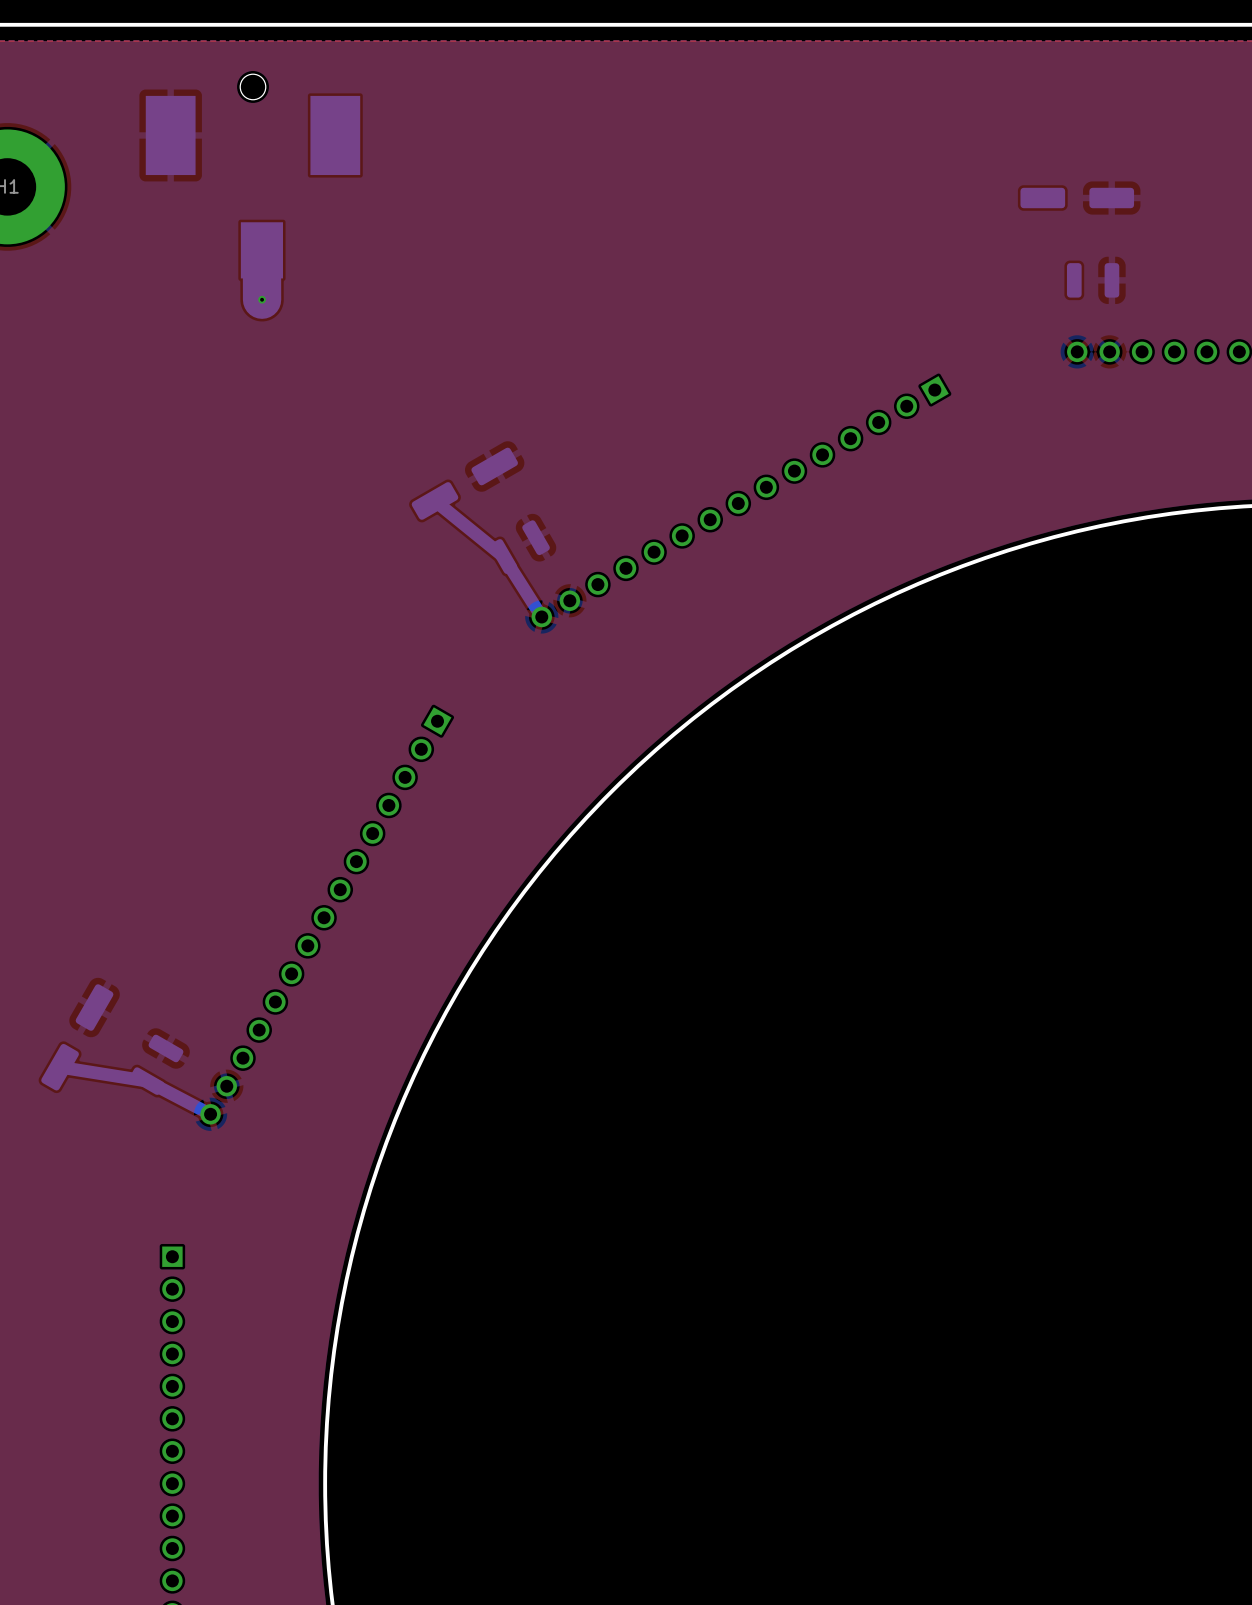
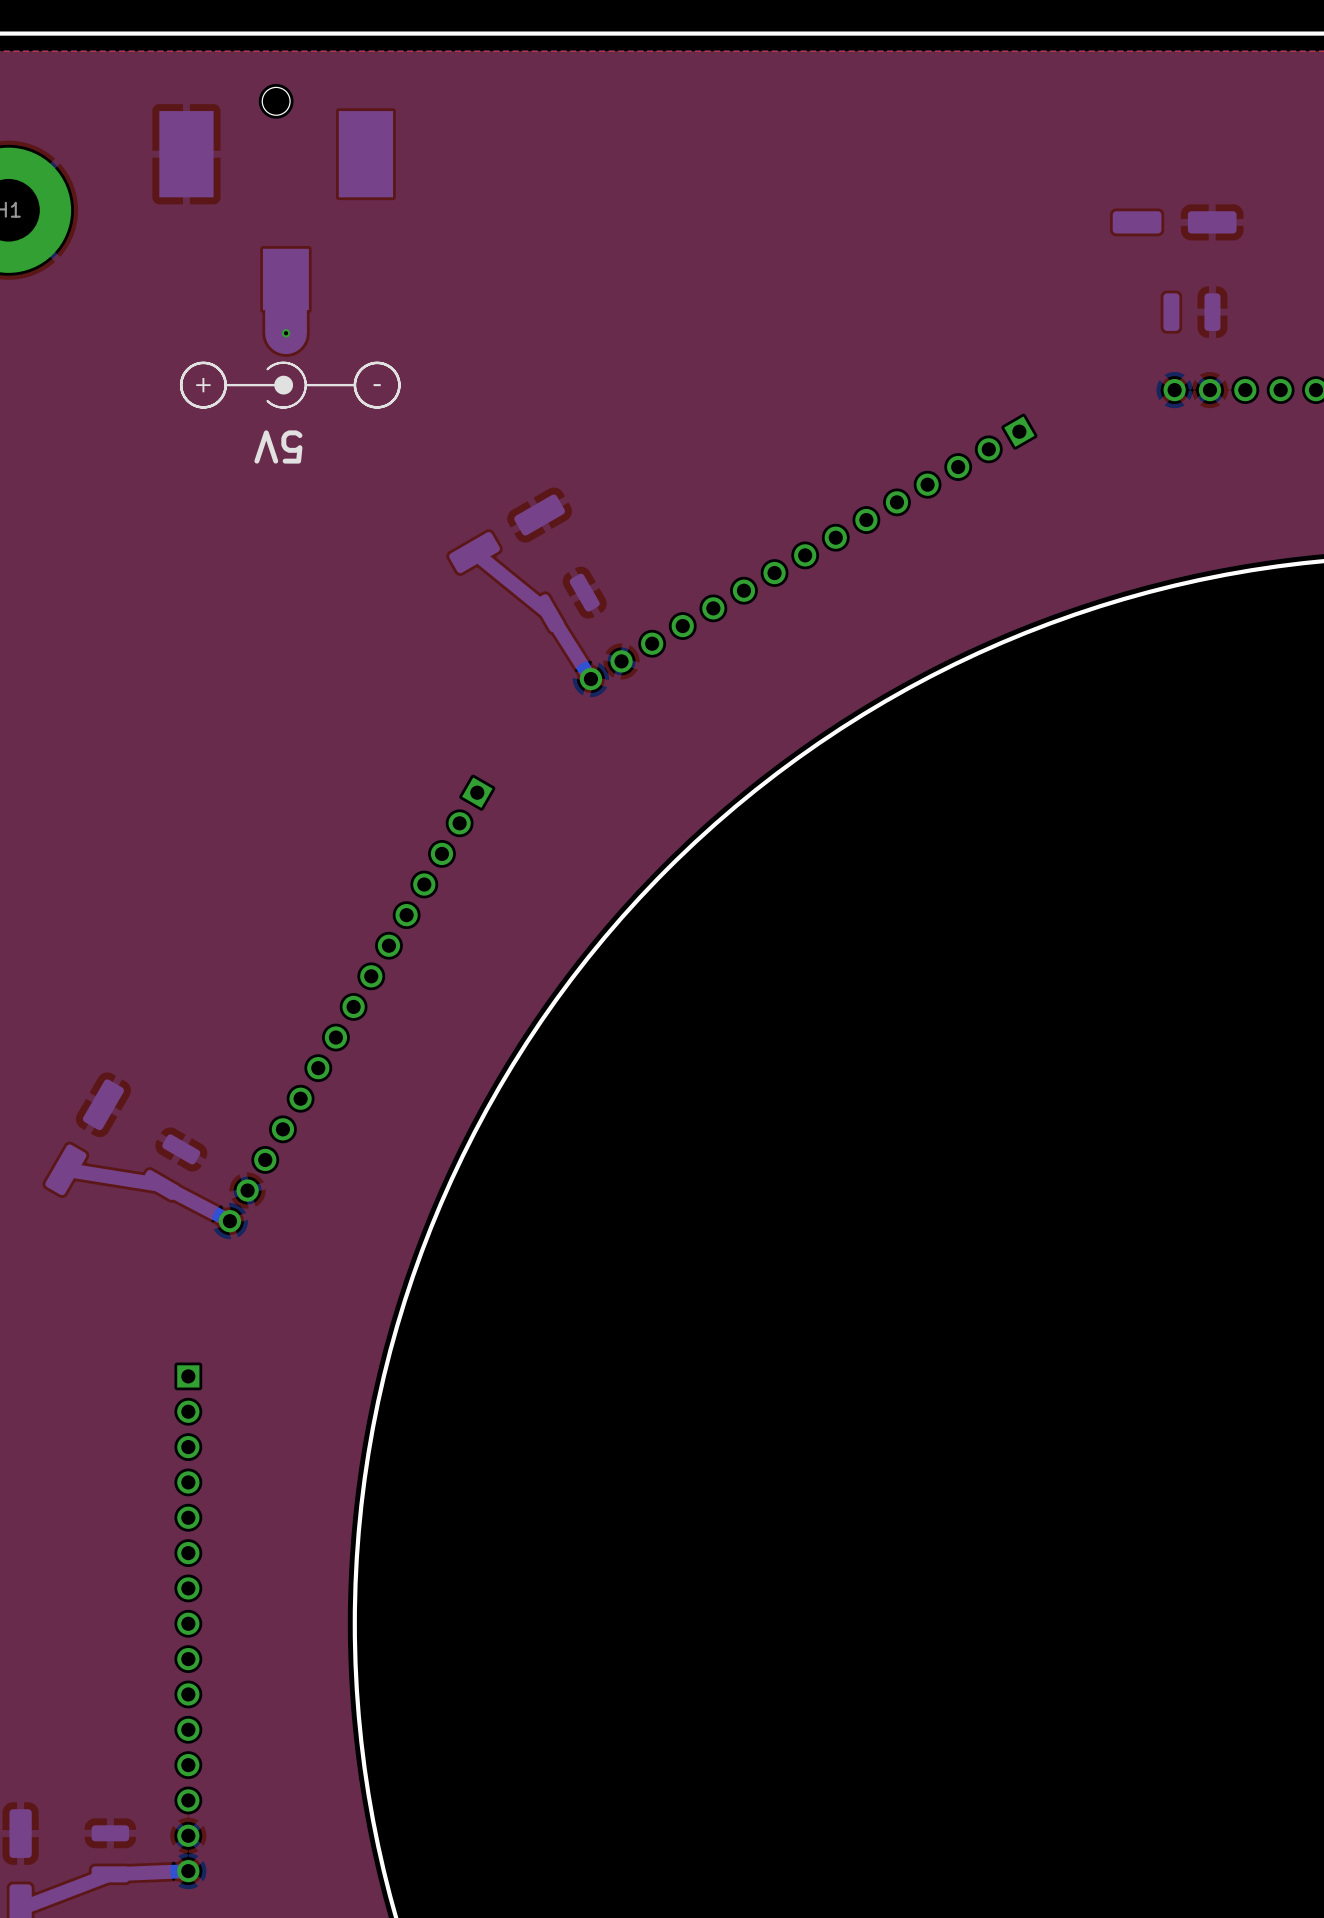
line: none -> (202, 362) (211, 364) (218, 368) (223, 375) (225, 383) (224, 392) (219, 400) (213, 405) (204, 407) (195, 406) (188, 401) (183, 394) (181, 386) (182, 377) (186, 370) (193, 365) (202, 362)
line: none -> (376, 362) (367, 365) (360, 370) (356, 377) (354, 386) (357, 394) (362, 401) (369, 406) (378, 407) (386, 405) (393, 400) (398, 392) (399, 383) (397, 375) (392, 368) (384, 364) (376, 362)
line: none -> (267, 369) (279, 363) (291, 364) (302, 372) (305, 385) (302, 397) (291, 405) (279, 407) (267, 400)
drawing: none -> [274, 375, 294, 395]
drawing: none -> [196, 377, 211, 393]
drawing: none -> [373, 384, 381, 387]
line: none -> (226, 385) (274, 385)
line: none -> (306, 385) (354, 385)
text: none -> 5V (278, 446)

